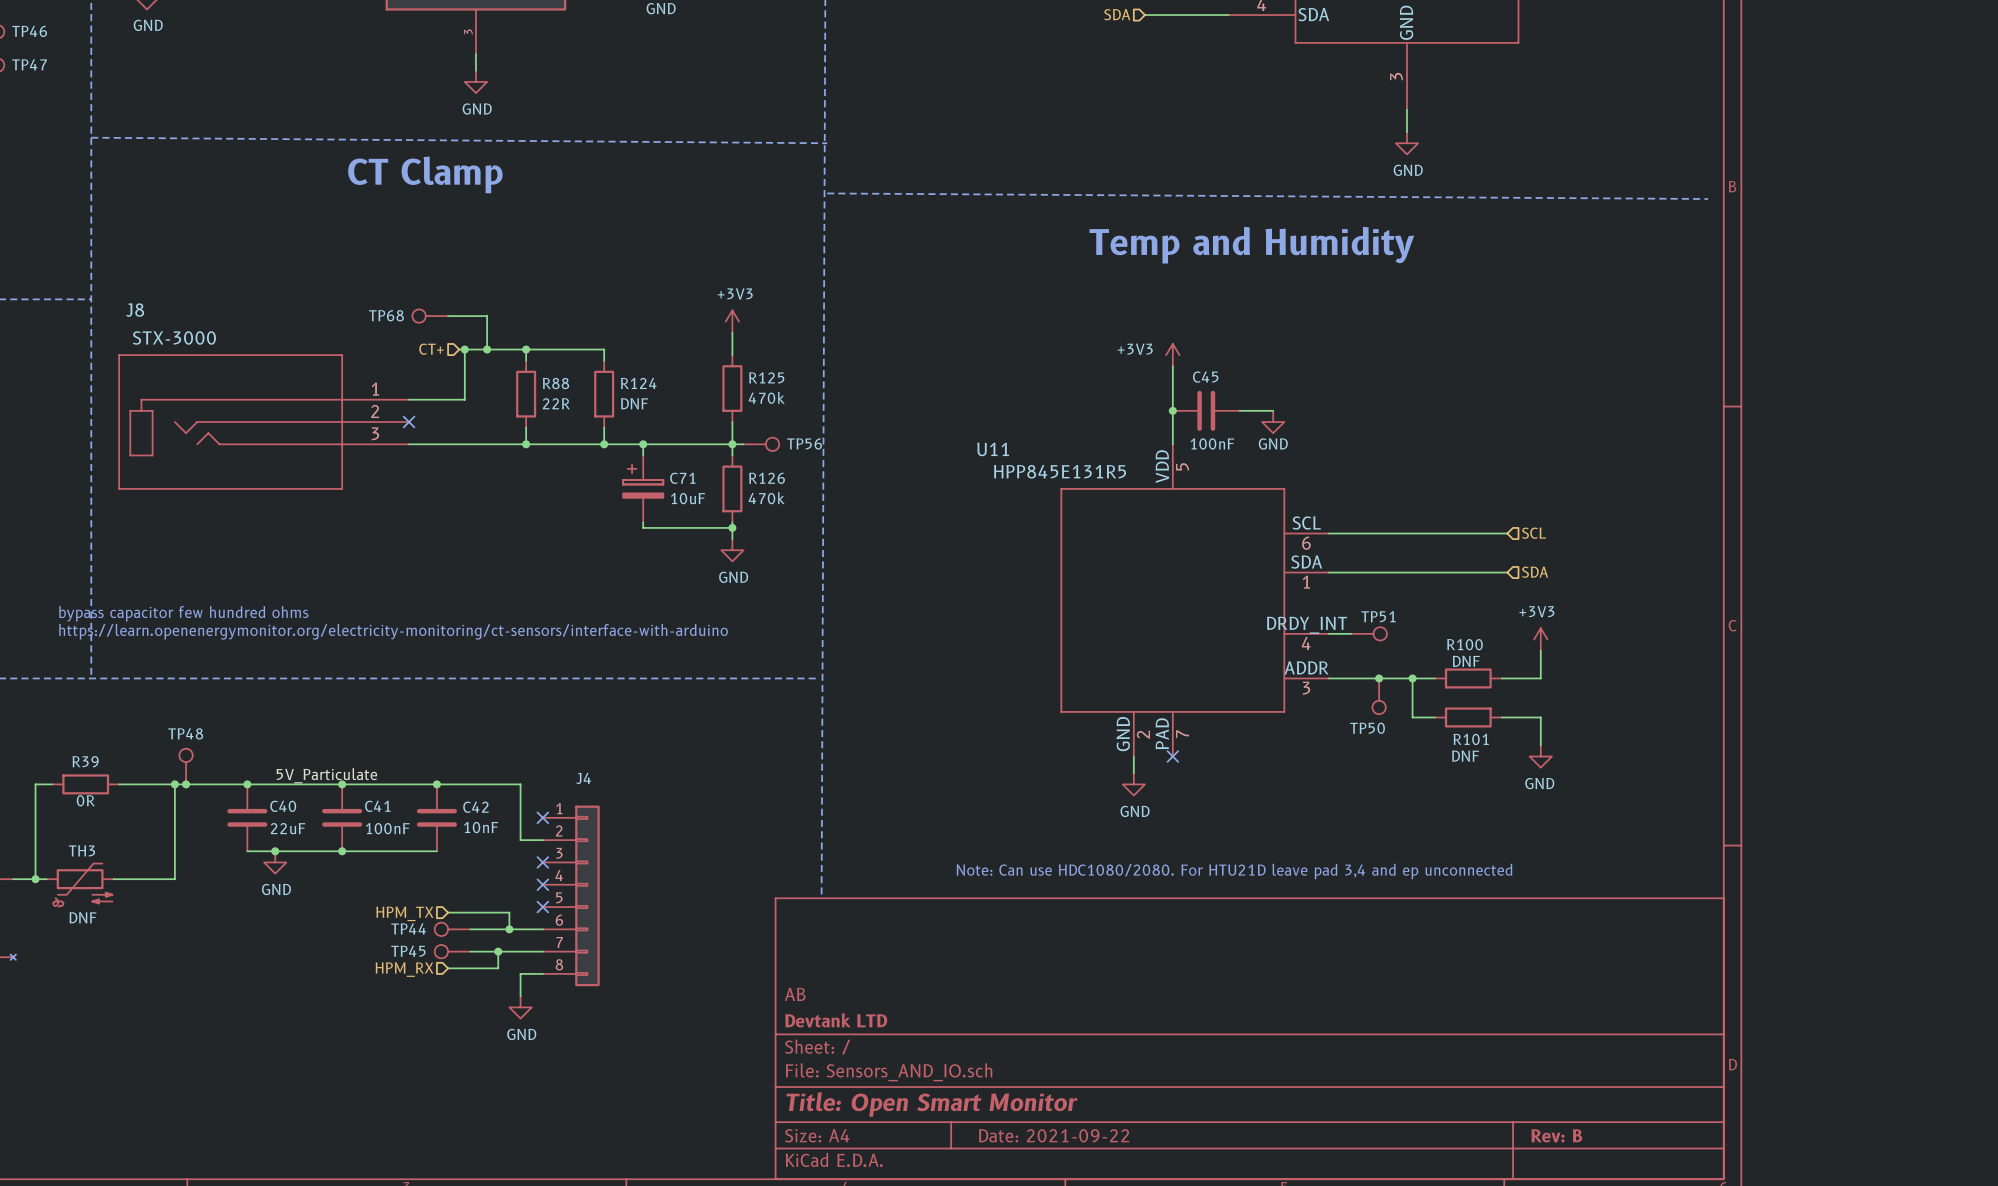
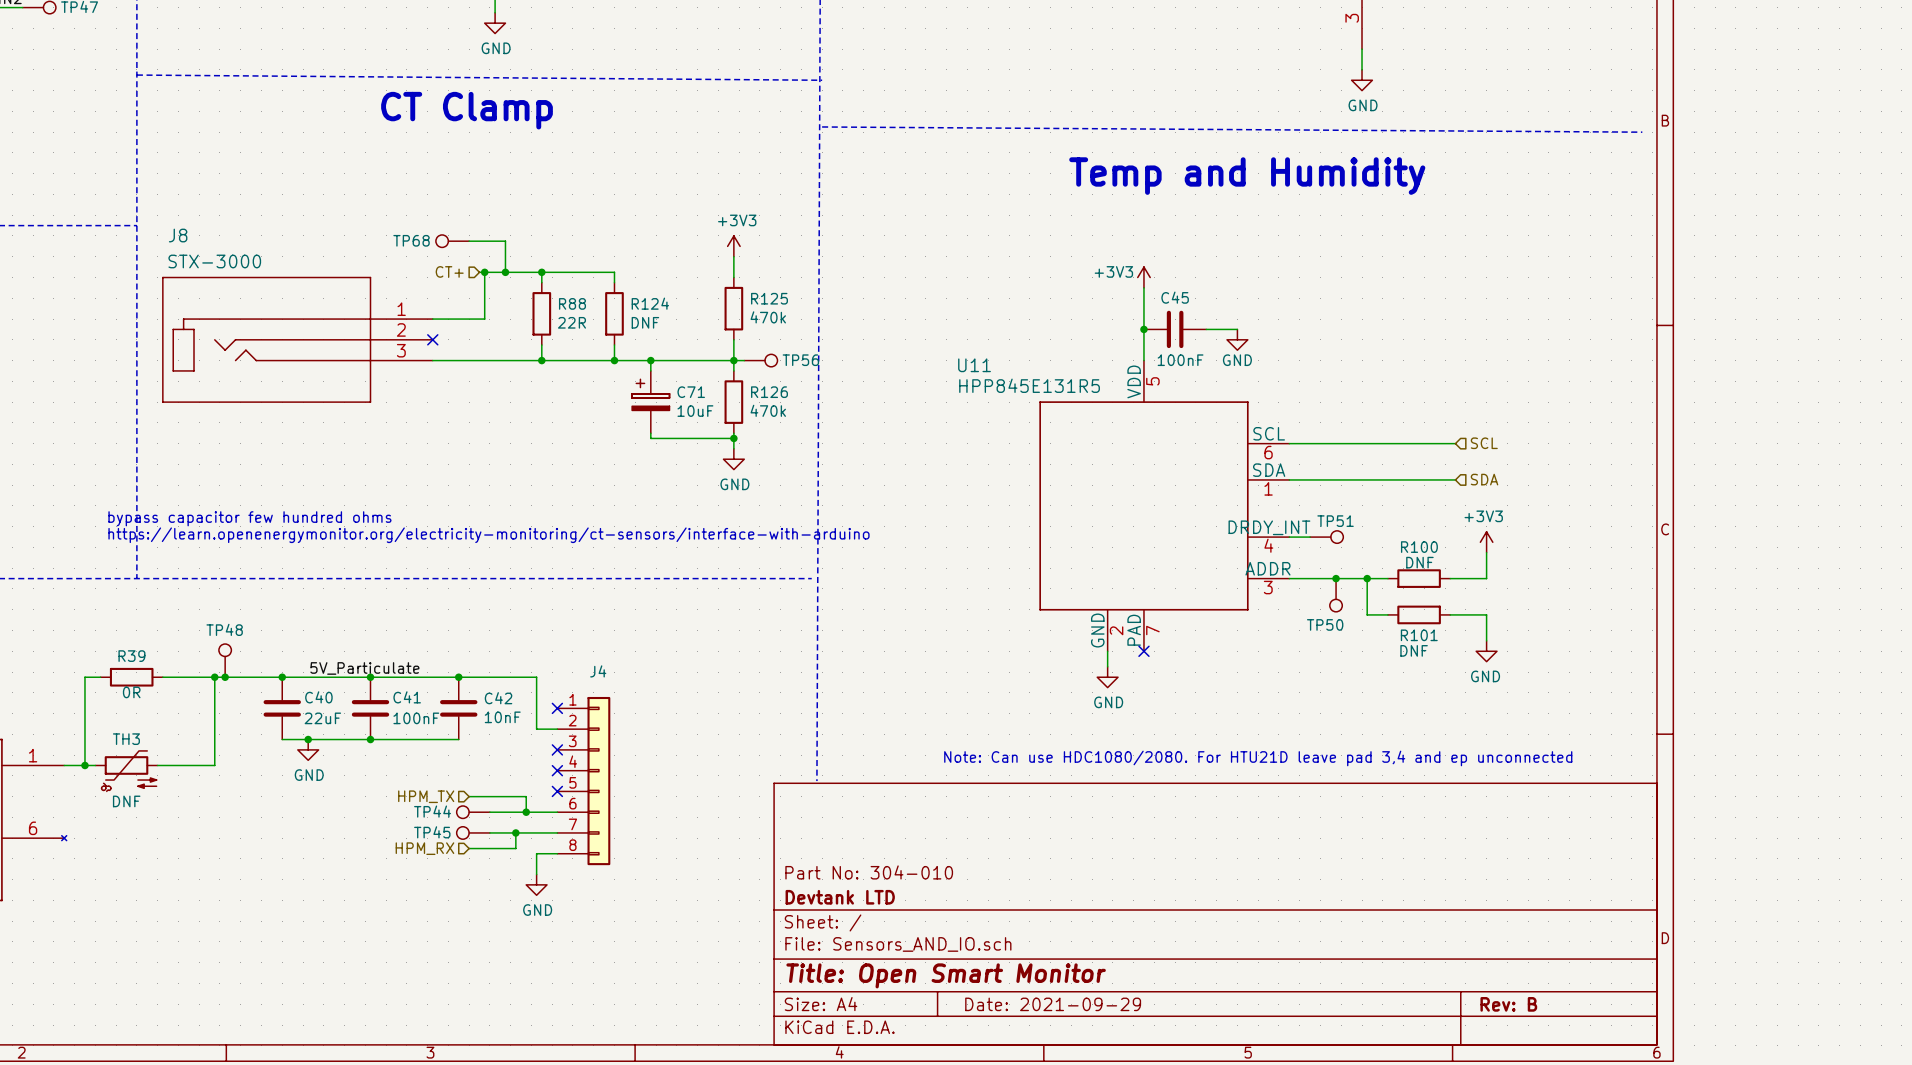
title block: AB (795, 994) -> Part No: 304-010 (869, 872)
title block: Date: 2021-09-22 (1054, 1135) -> Date: 2021-09-29 (1053, 1004)

